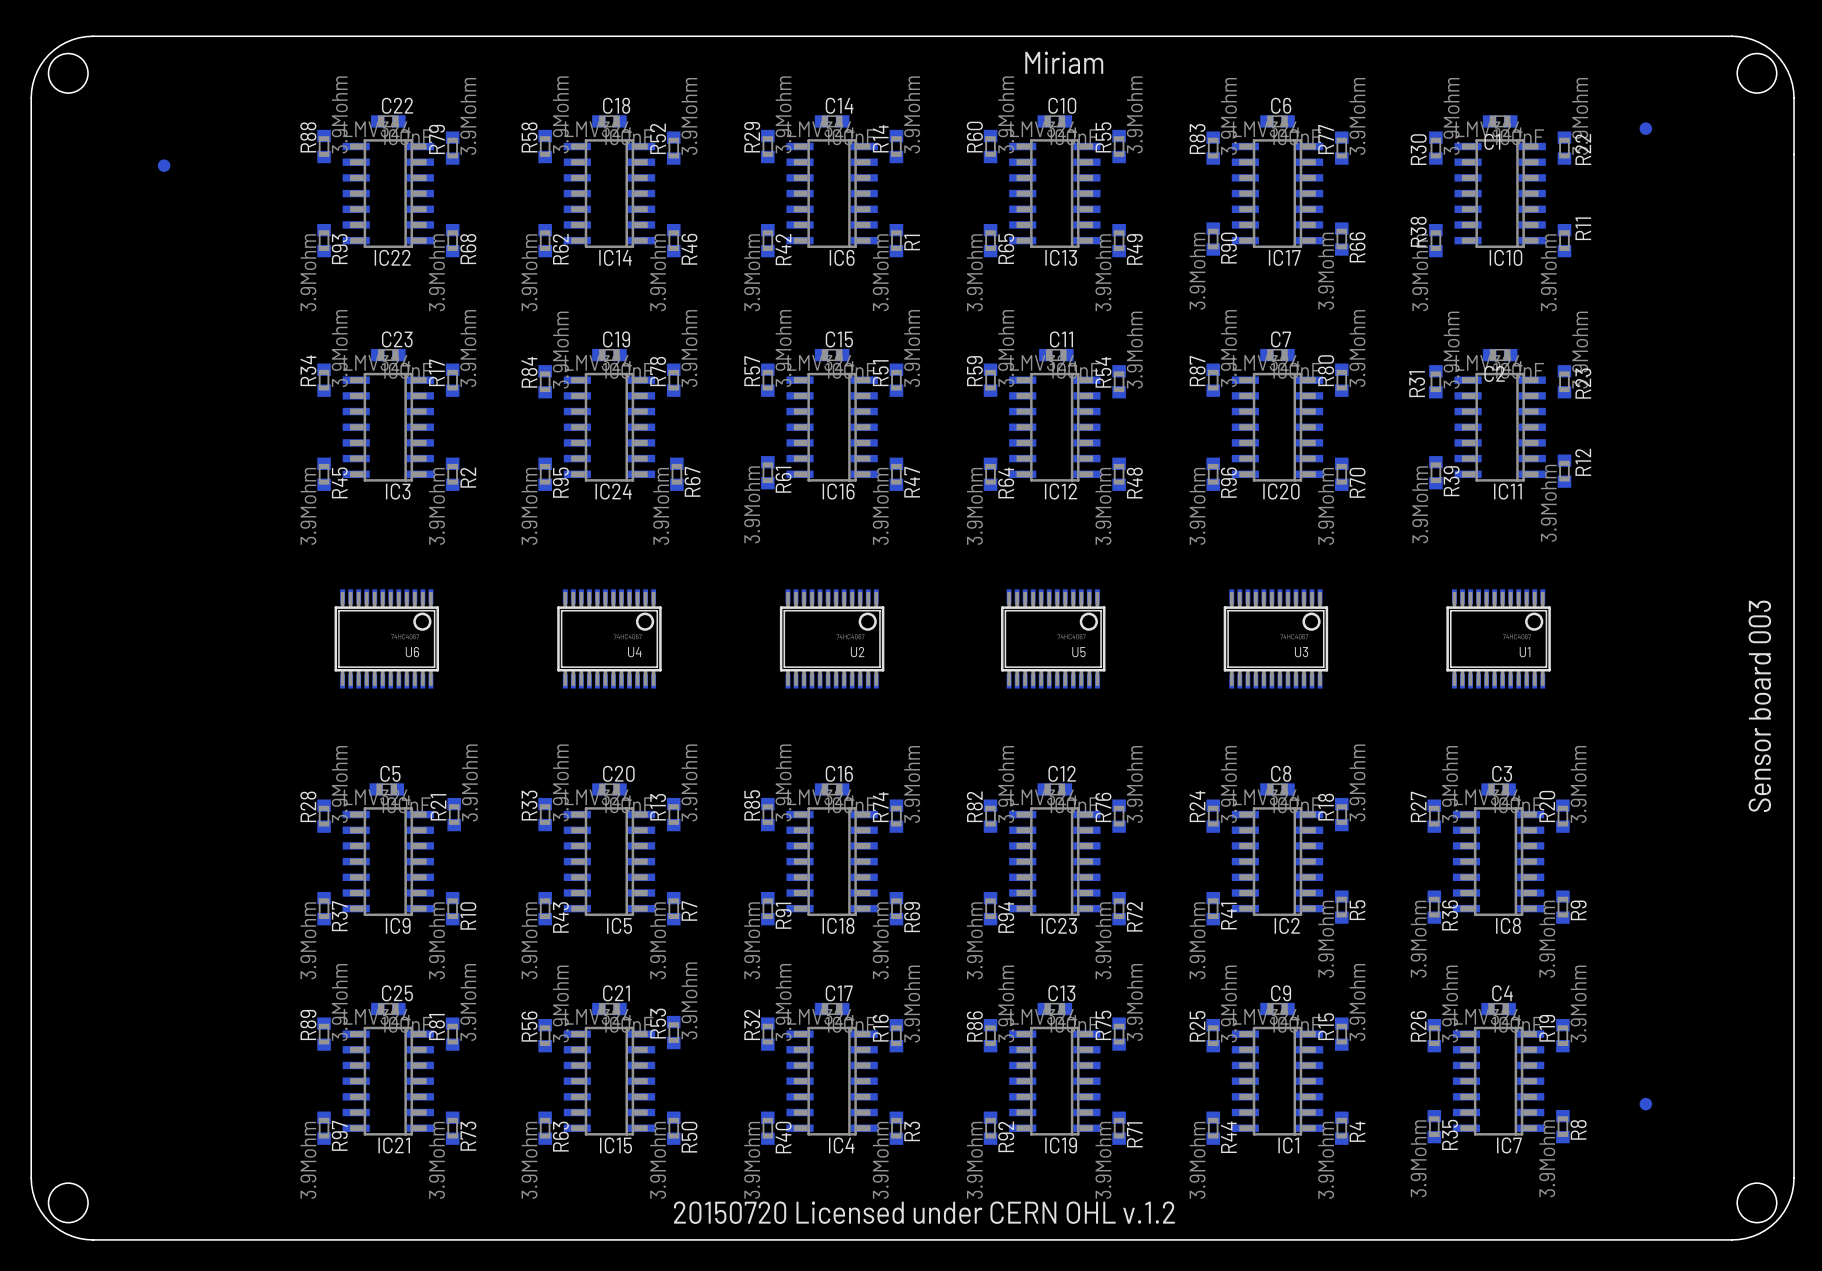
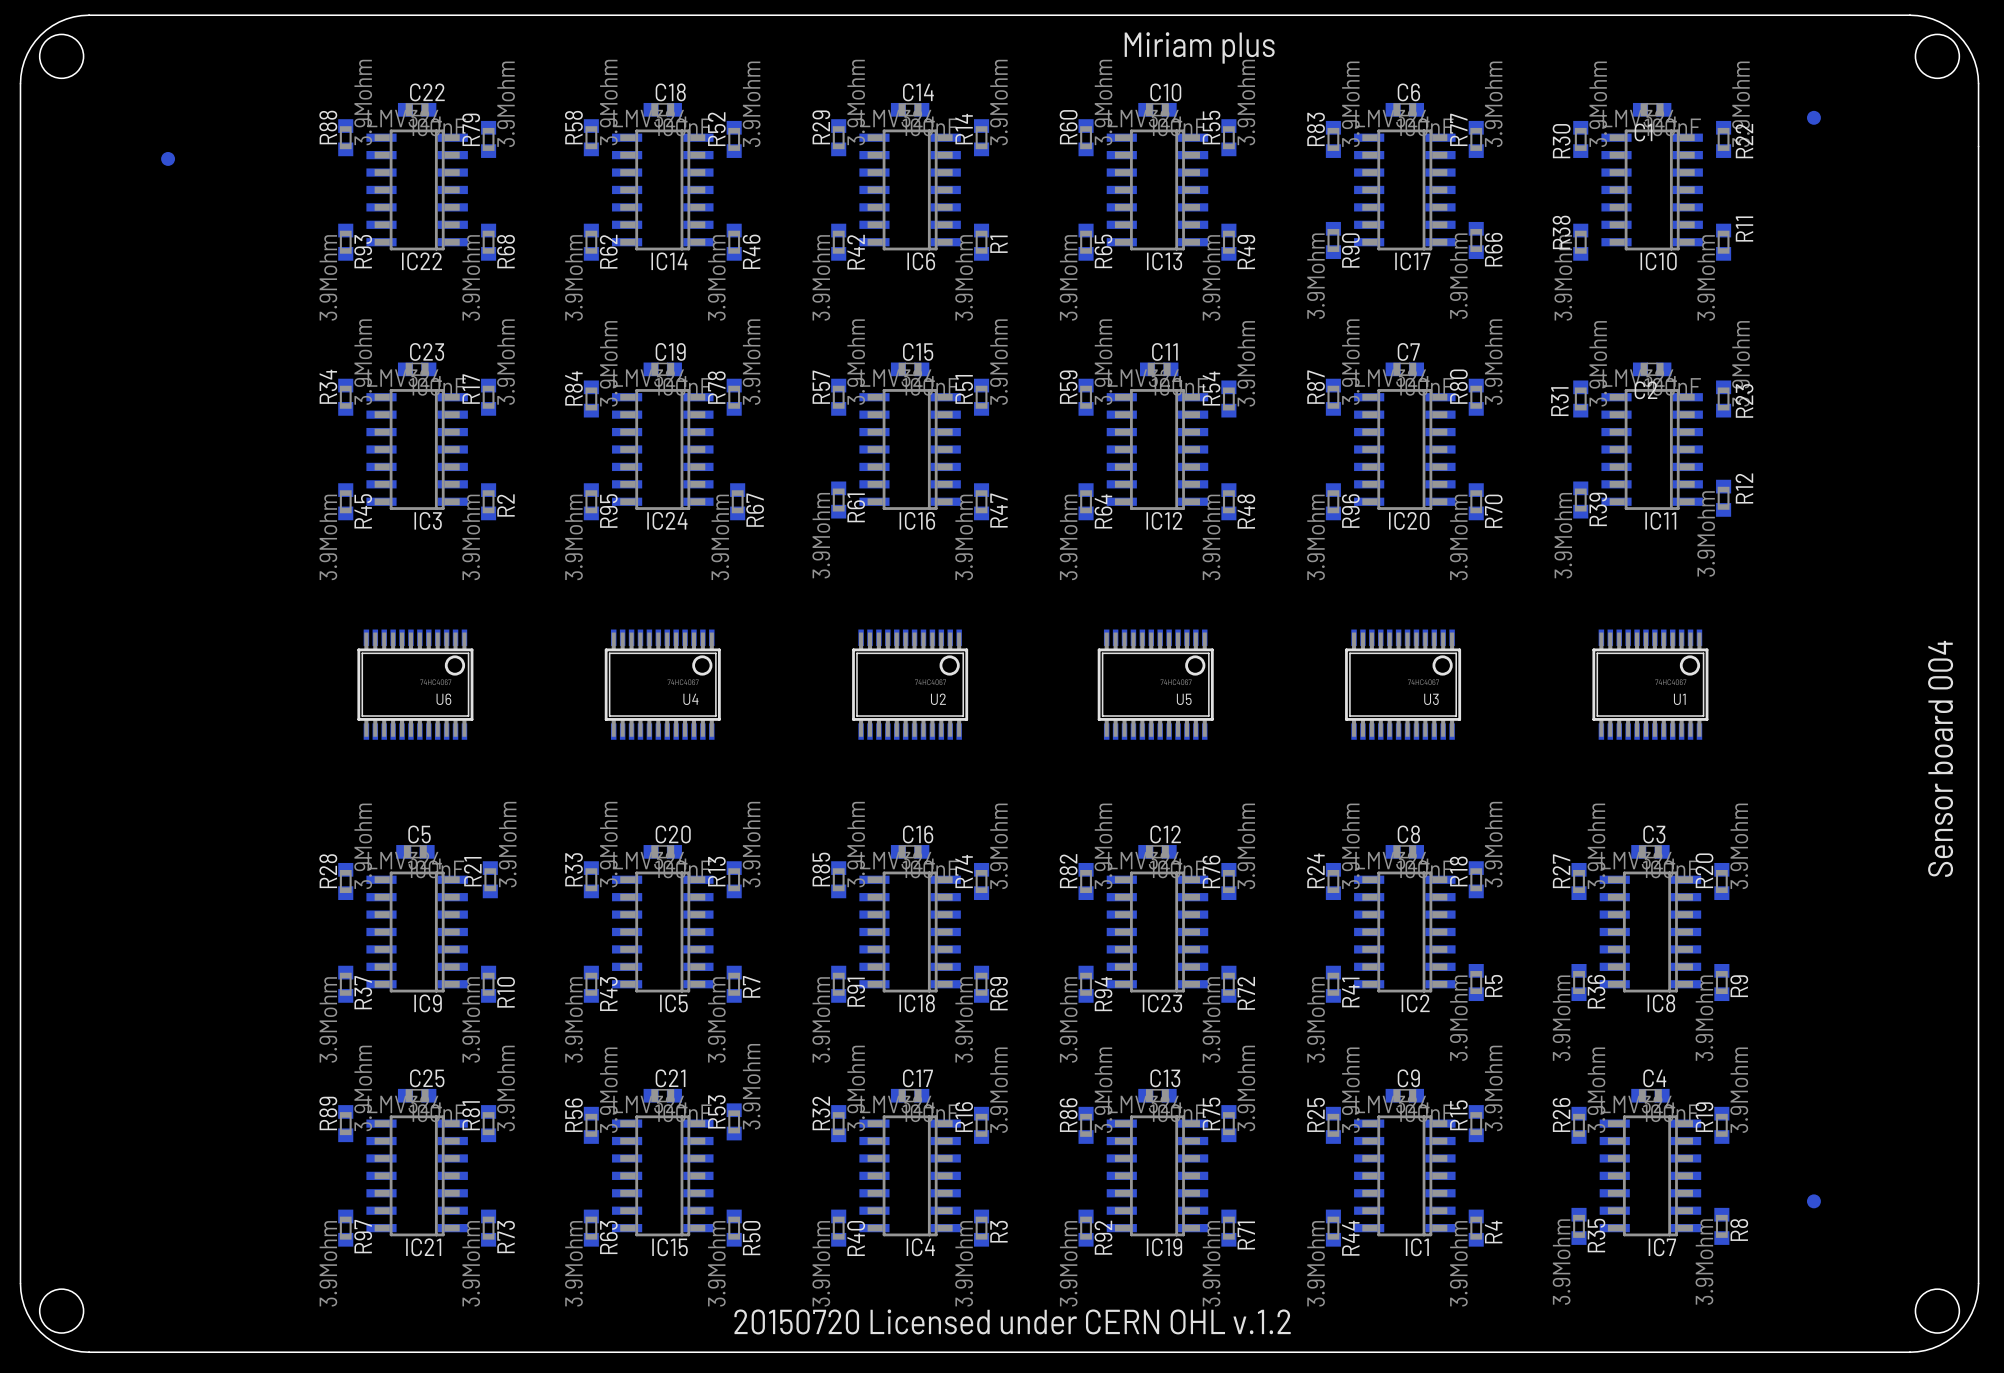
text: Miriam (1064, 62) -> Miriam plus (1199, 47)
text: Sensor board 003 (1759, 706) -> Sensor board 004 (1940, 758)

